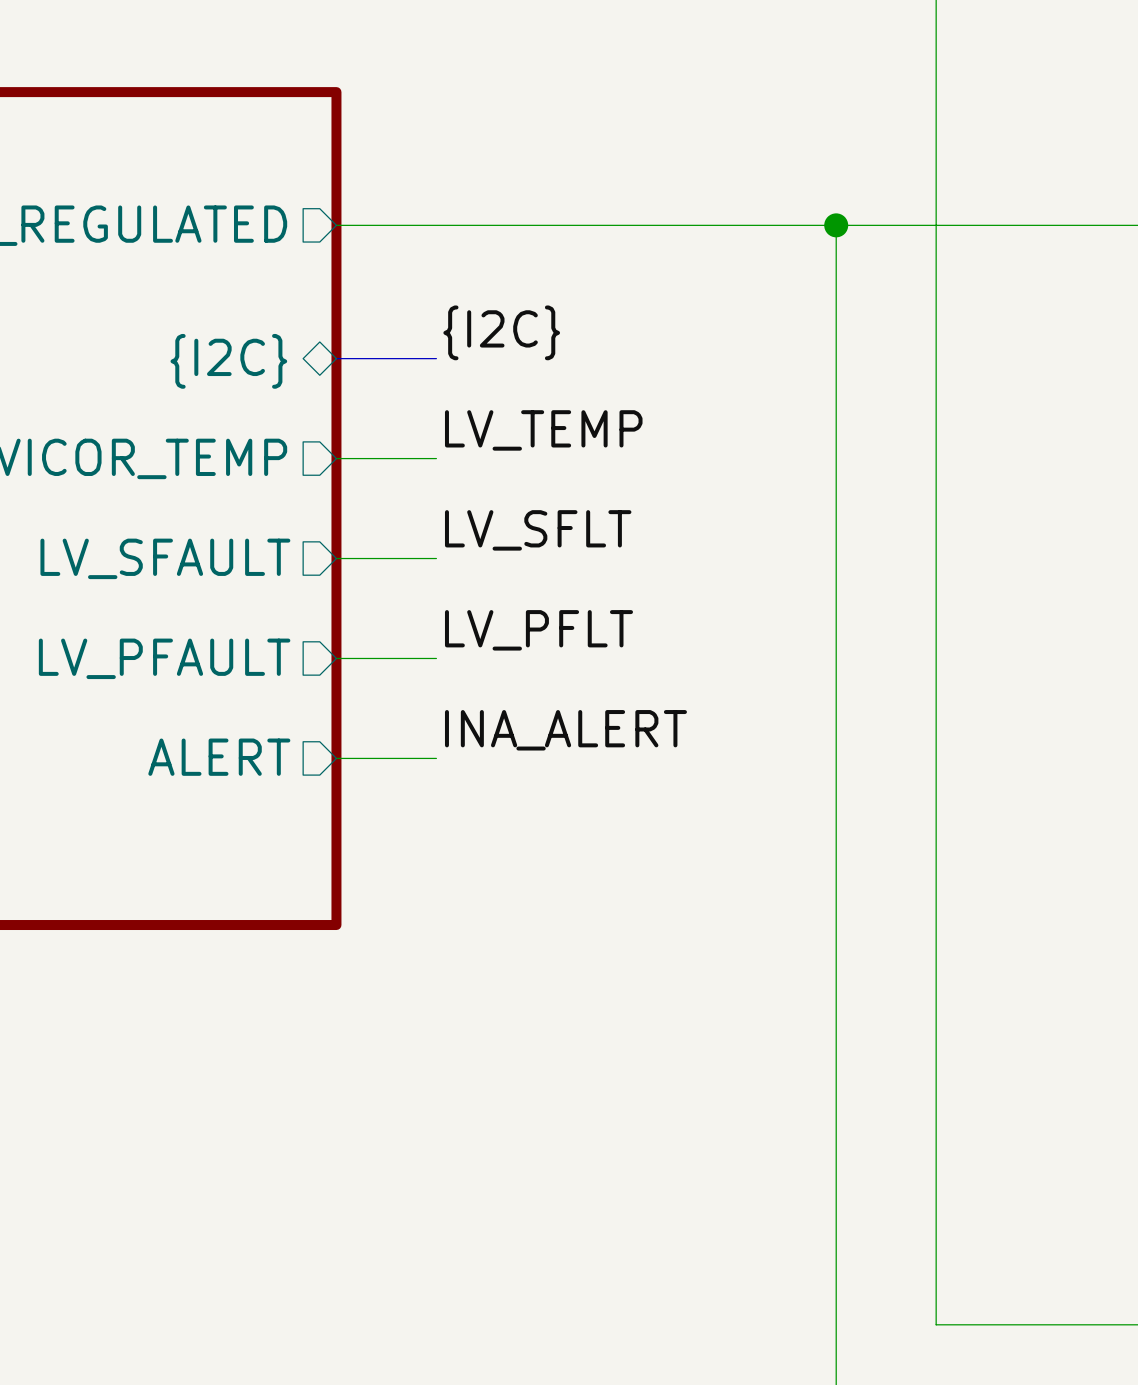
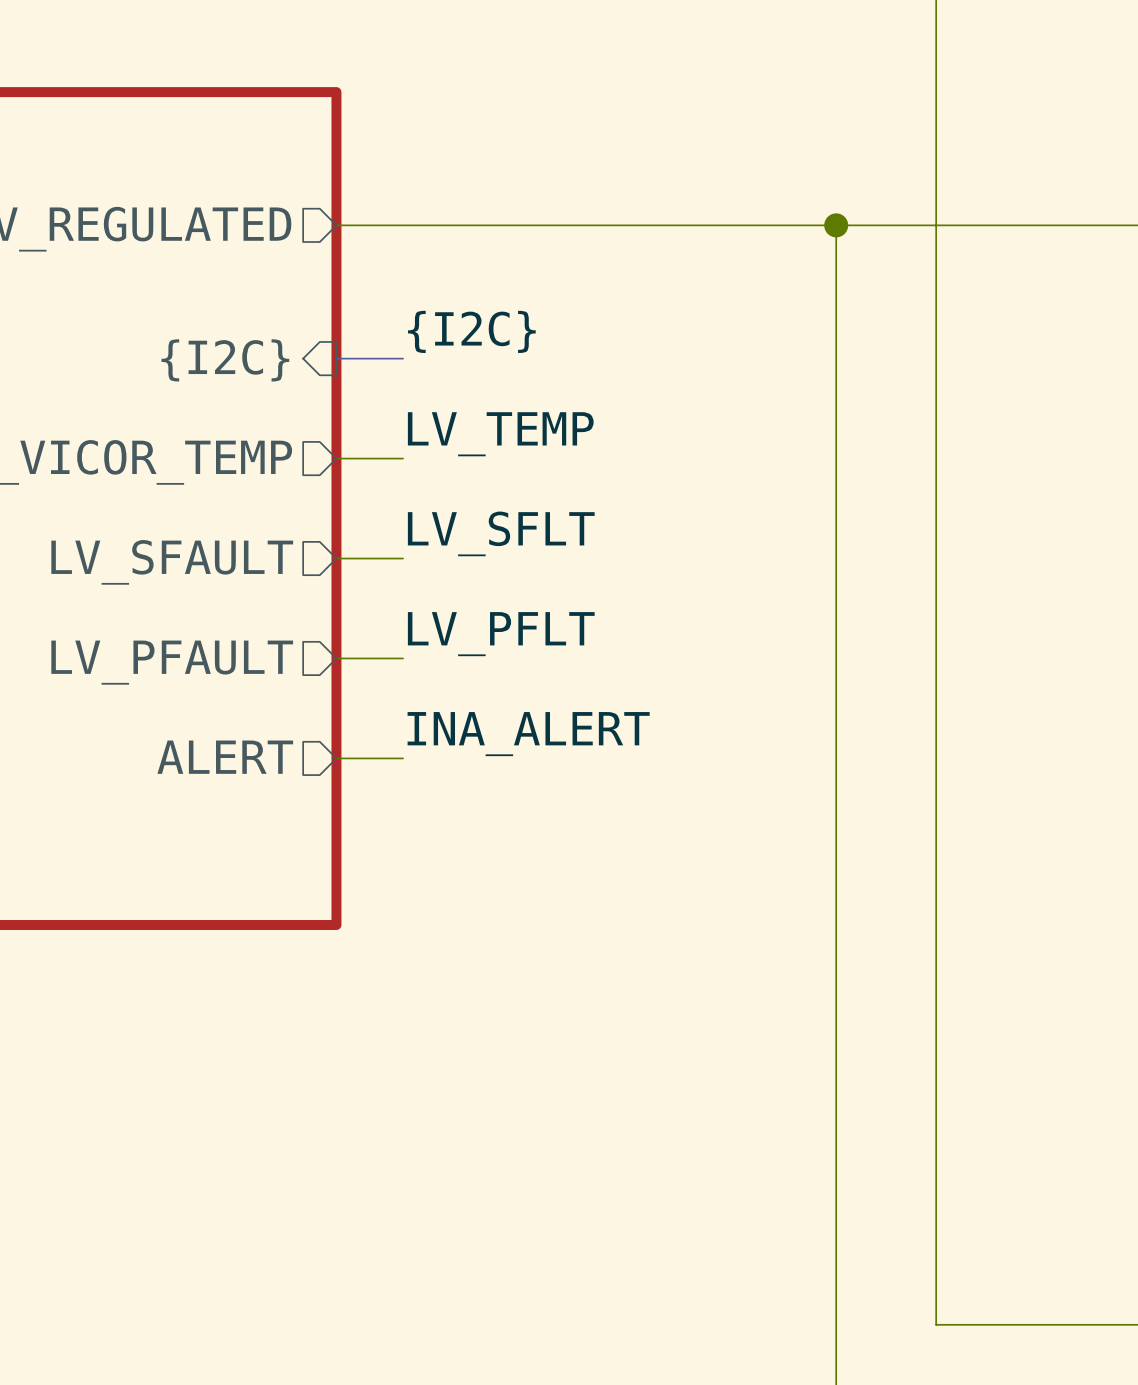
label position: {I2C} (501, 332) -> {I2C} (471, 331)
bus: (403, 358) (436, 358) -> none
sheet pin shape: bidirectional (228, 361) -> input (225, 360)
label position: LV_TEMP (543, 430) -> LV_TEMP (500, 434)
wire: (403, 458) (436, 458) -> none
label position: LV_SFLT (538, 530) -> LV_SFLT (501, 533)
wire: (403, 558) (436, 558) -> none
label position: LV_PFLT (538, 630) -> LV_PFLT (501, 634)
wire: (403, 658) (436, 658) -> none
label position: INA_ALERT (565, 730) -> INA_ALERT (528, 734)
wire: (403, 758) (436, 758) -> none

